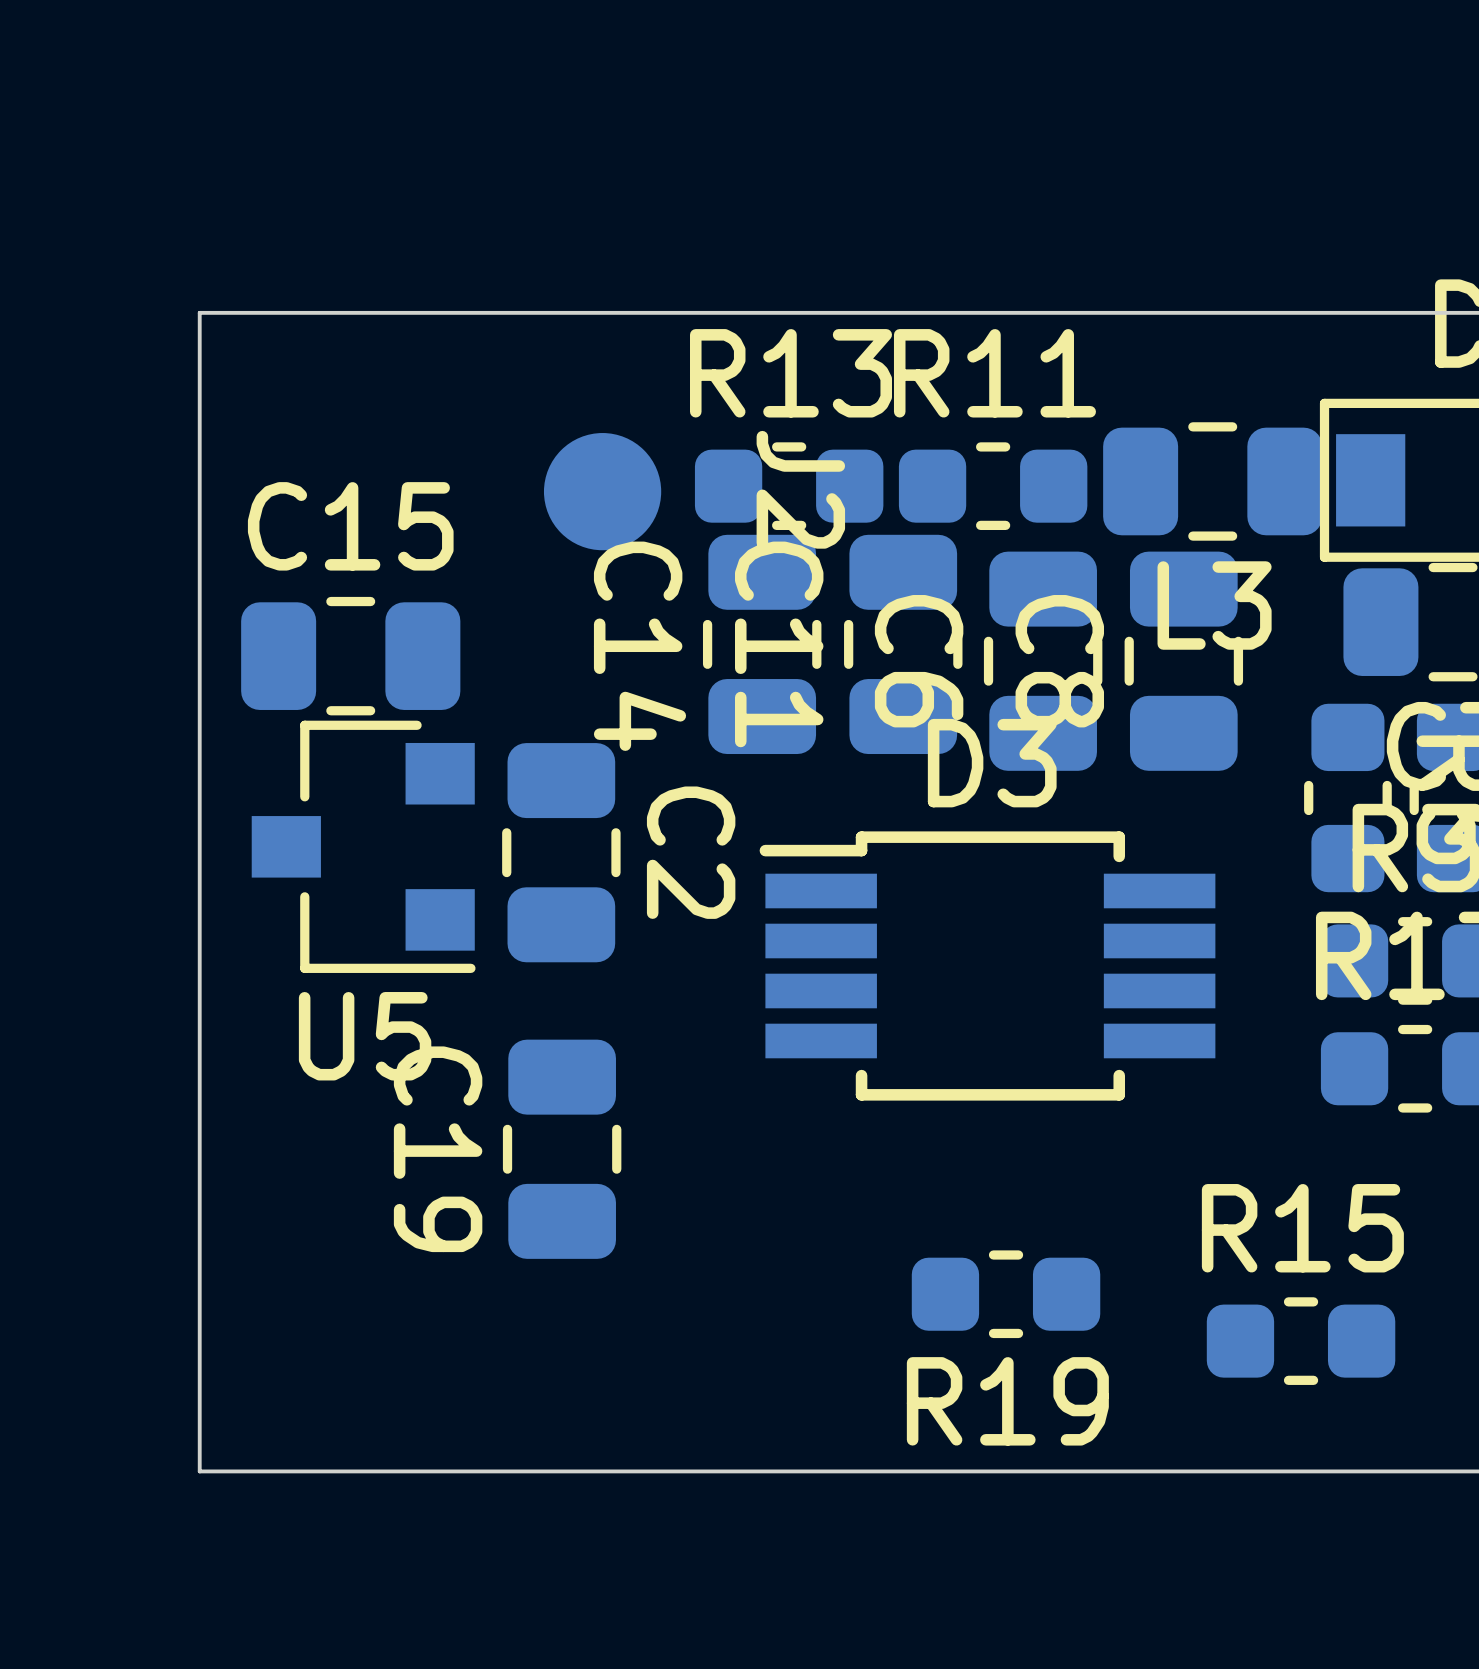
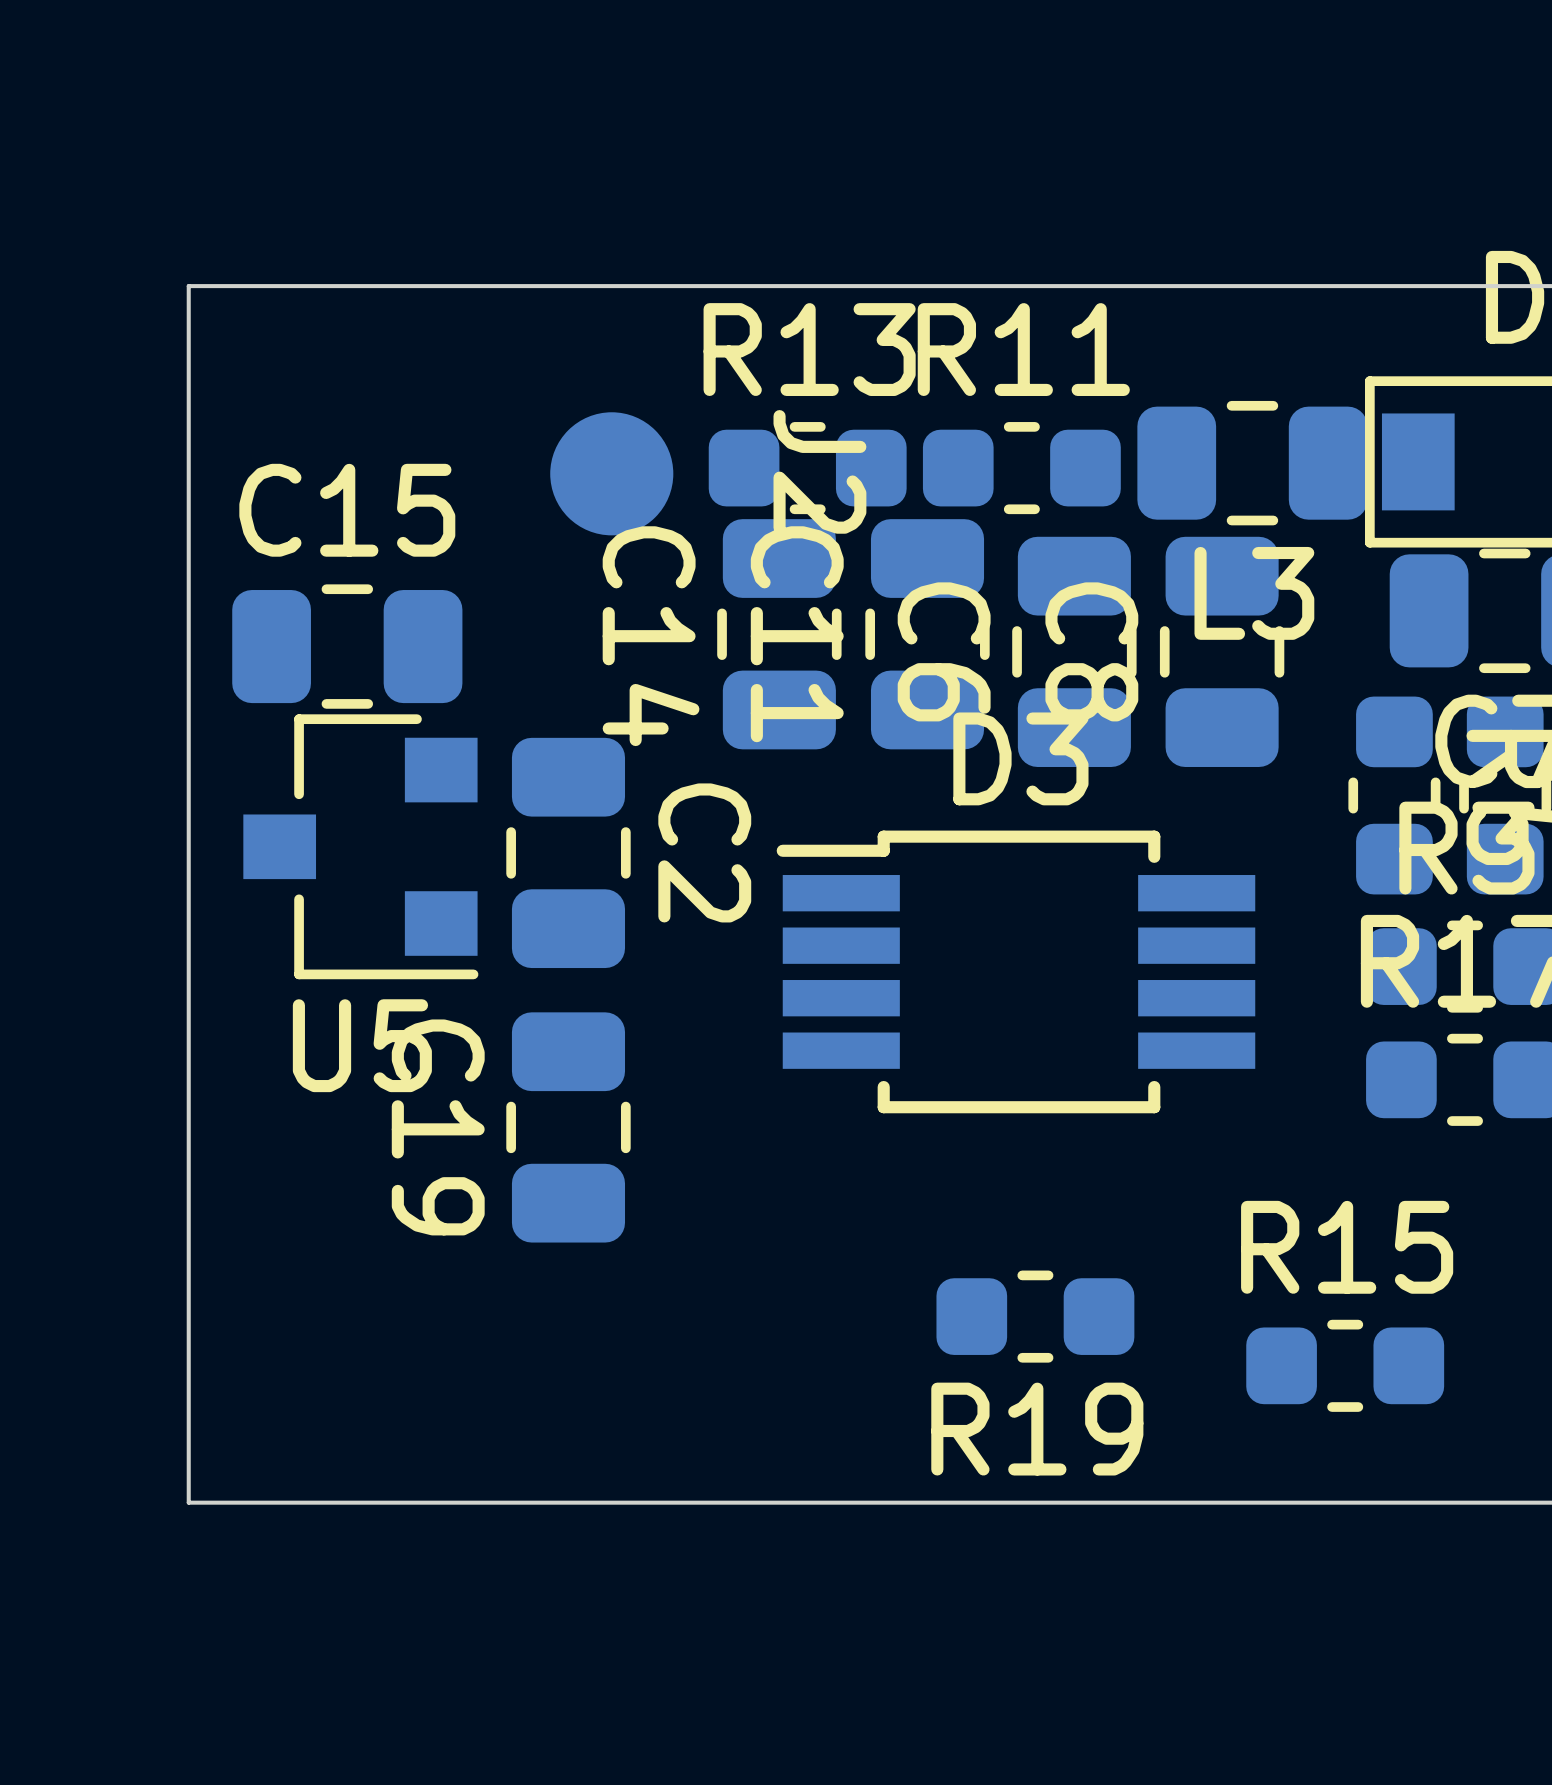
C19 position: (562, 1149) -> (568, 1127)

